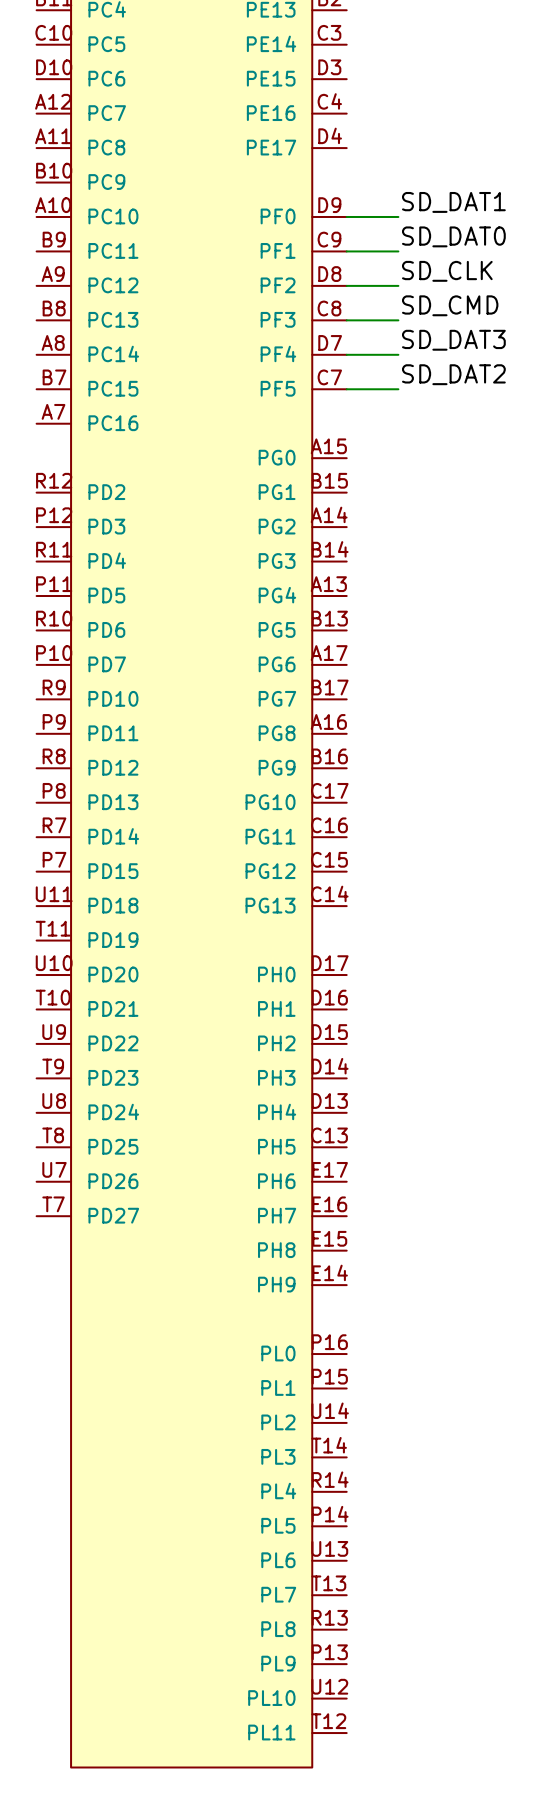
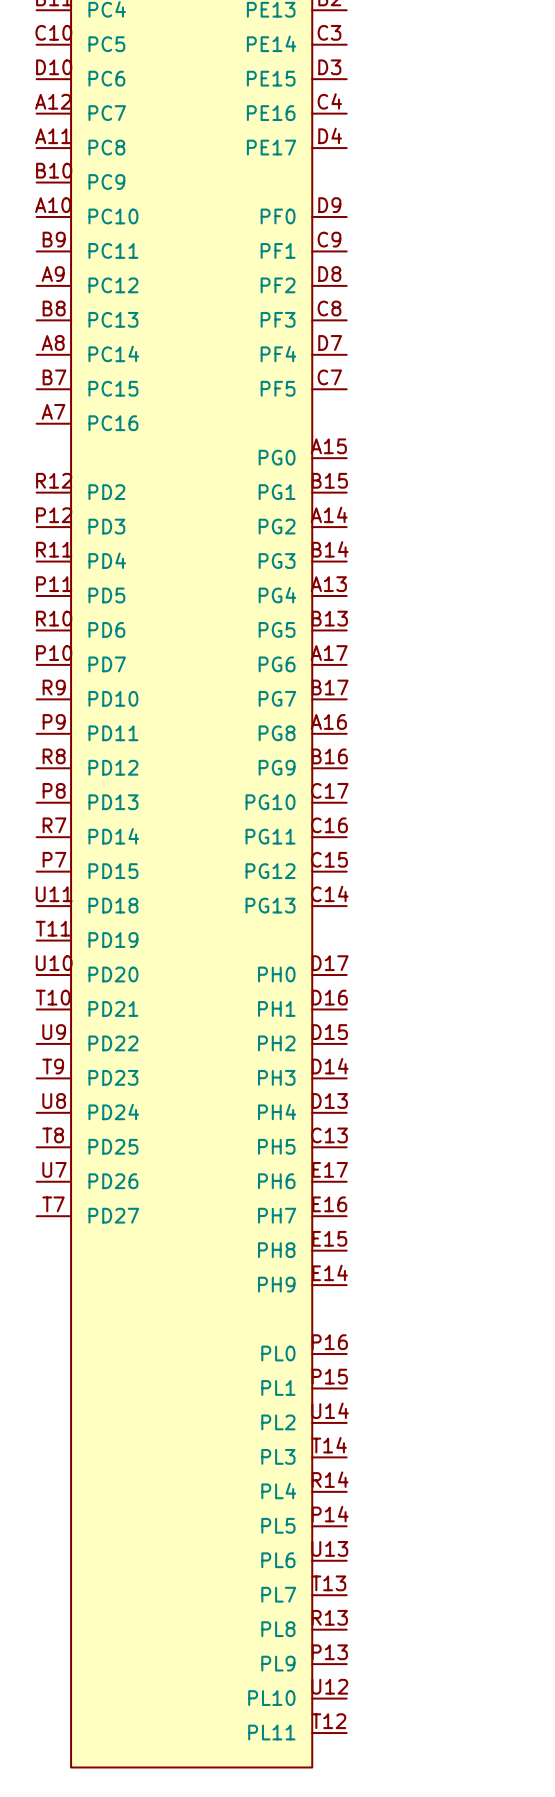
label: SD_DAT1 (453, 202) -> none
wire: (346, 216) (398, 216) -> none
label: SD_DAT0 (453, 236) -> none
wire: (346, 251) (398, 251) -> none
label: SD_CLK (447, 271) -> none
wire: (346, 285) (398, 285) -> none
label: SD_CMD (450, 305) -> none
wire: (346, 320) (398, 320) -> none
label: SD_DAT3 (453, 340) -> none
wire: (346, 354) (398, 354) -> none
label: SD_DAT2 (453, 374) -> none
wire: (346, 389) (398, 389) -> none

